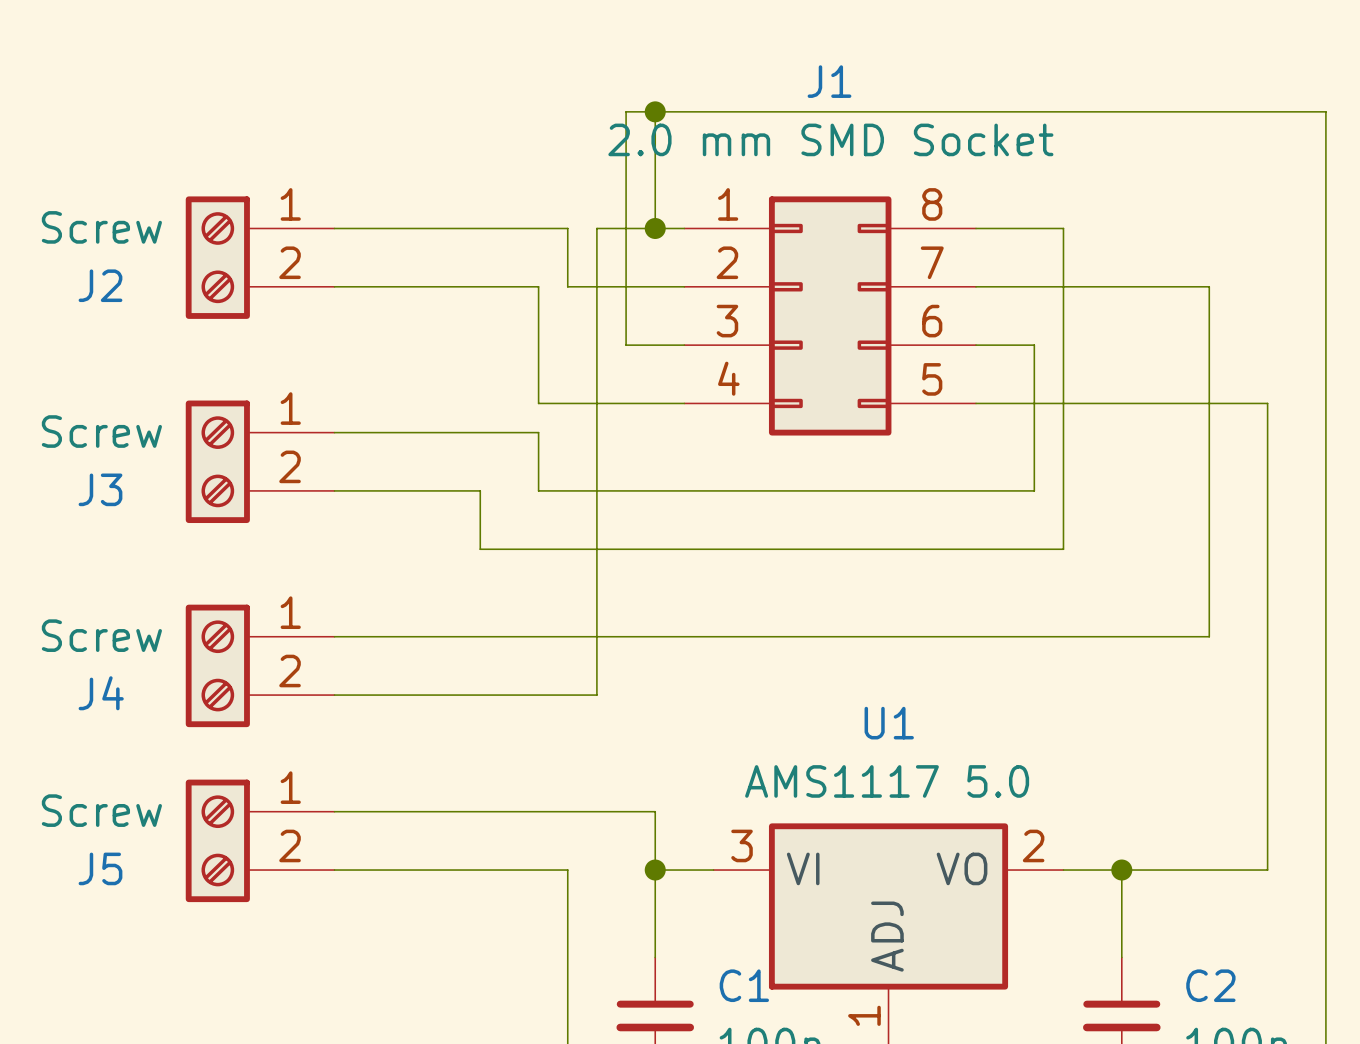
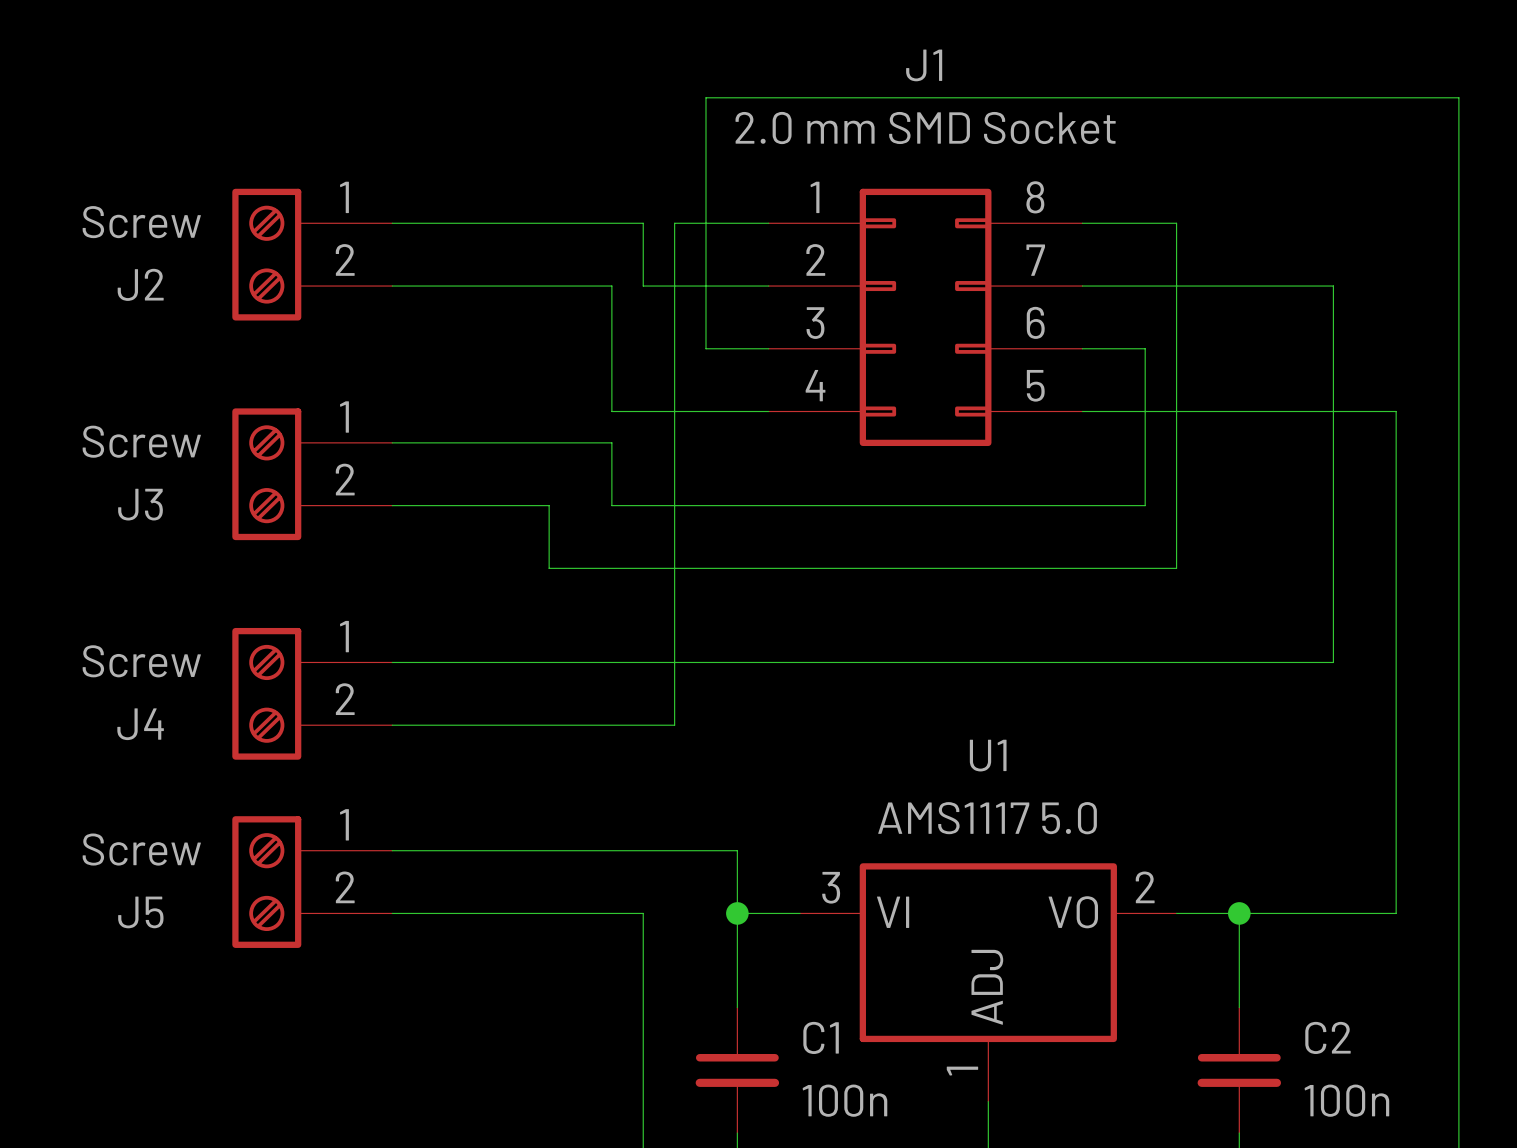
wire: (655, 111) (655, 228) -> none
junction: (655, 111) -> none
junction: (655, 228) -> none

